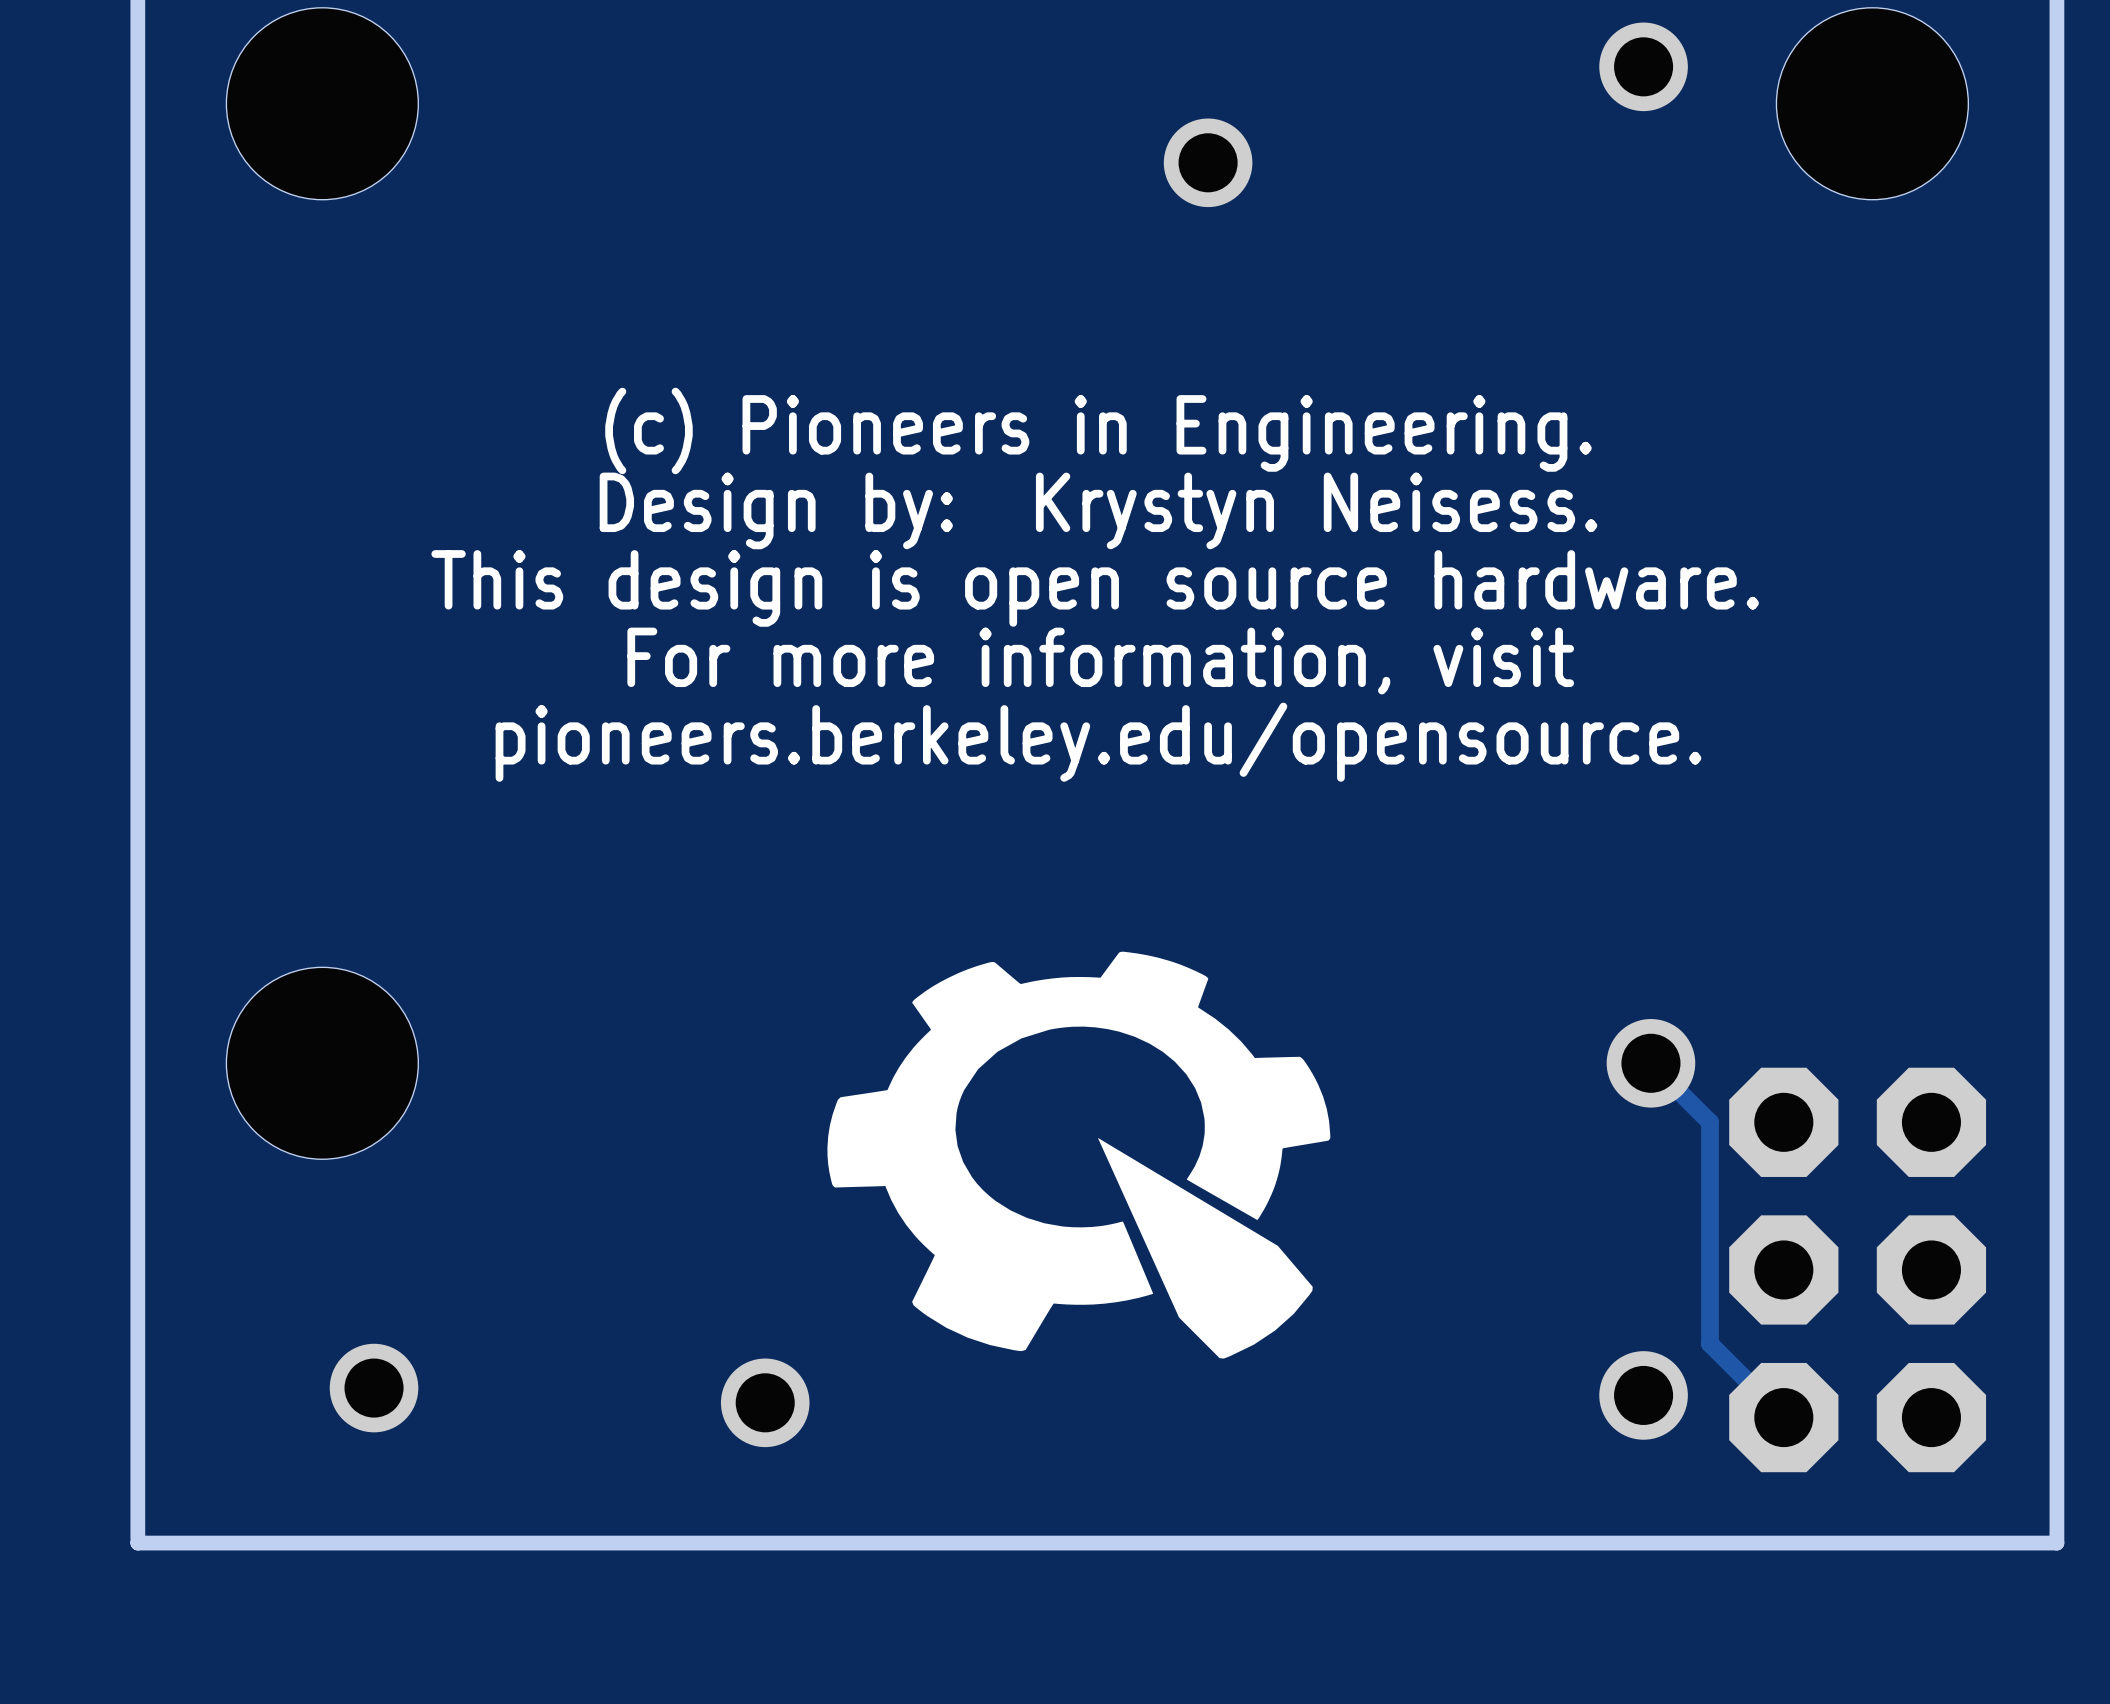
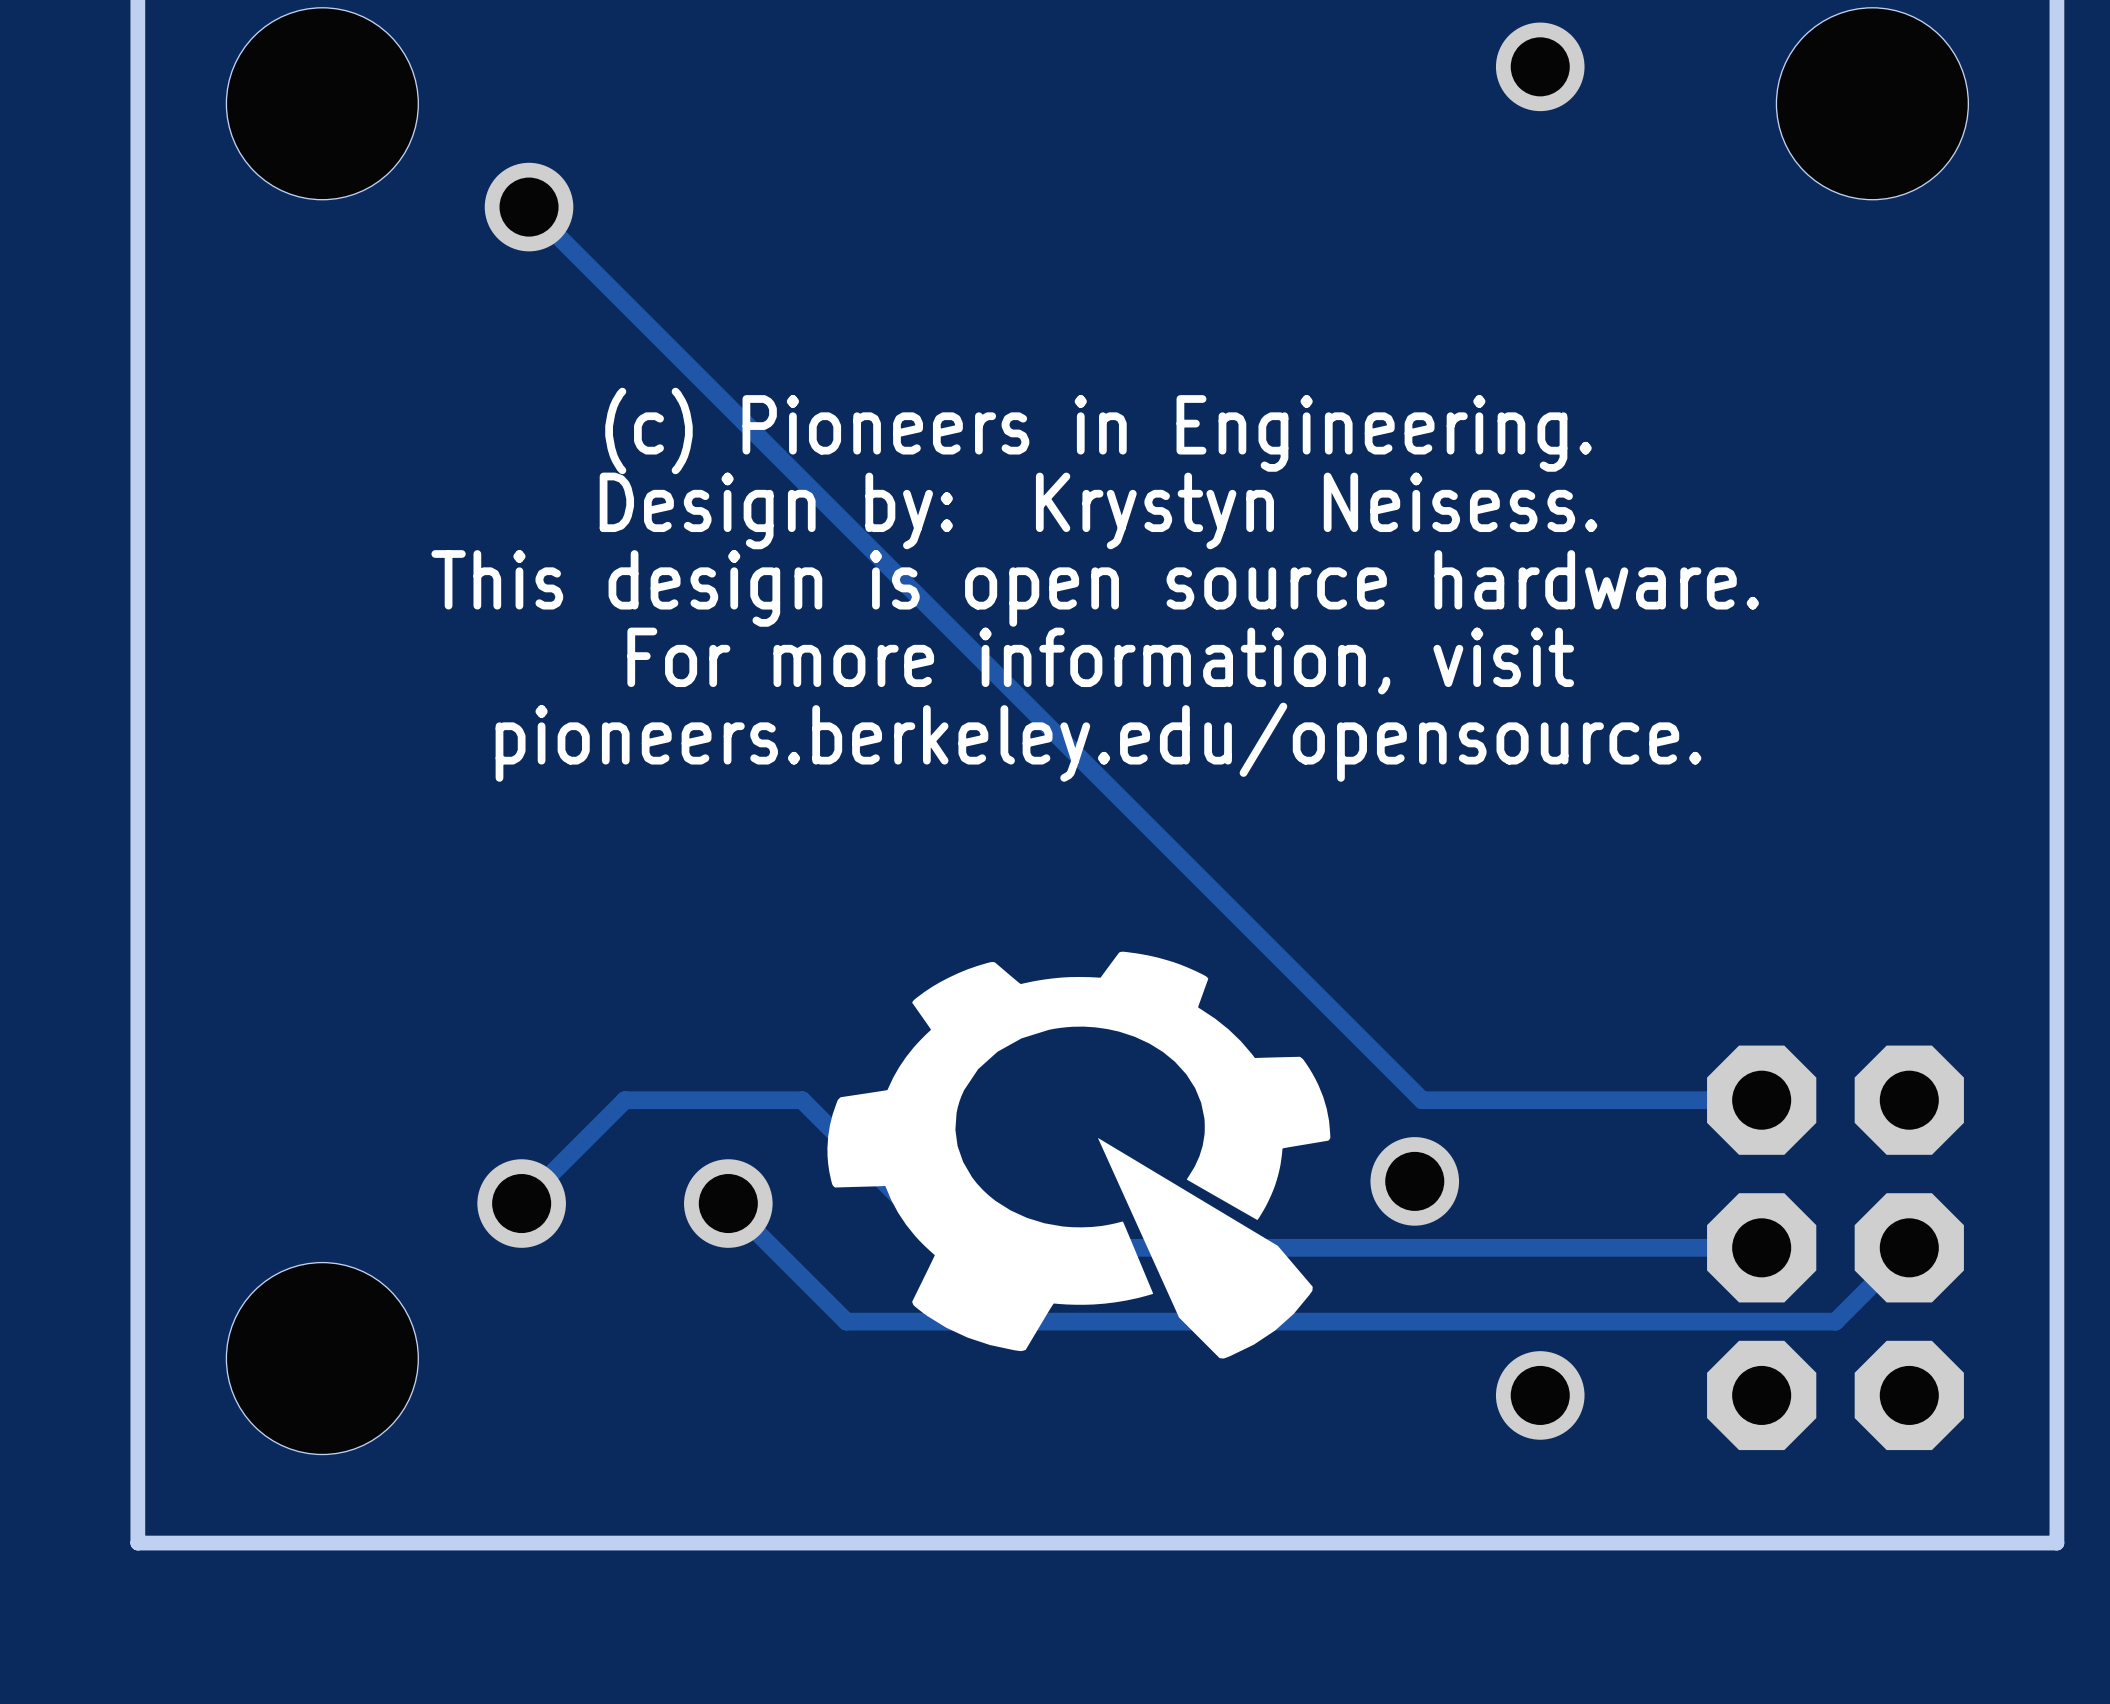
part position: (1643, 66) -> (1540, 66)
part: (1208, 162) -> none
track: none -> (529, 207) (1422, 1100) (1761, 1100)
part: none -> (529, 207)
part position: (322, 1063) -> (322, 1358)
track: (1650, 1063) (1710, 1122) (1710, 1343) (1783, 1417) -> none
part: (1650, 1063) -> none
part: none -> (1414, 1181)
track: none -> (521, 1203) (624, 1100) (802, 1100) (949, 1247) (1761, 1247)
part: none -> (521, 1203)
track: none -> (728, 1203) (846, 1321) (1835, 1321) (1909, 1247)
part: none -> (728, 1203)
part position: (1857, 1269) -> (1835, 1247)
part: (374, 1388) -> none
part position: (1643, 1395) -> (1540, 1395)
part: (765, 1402) -> none

